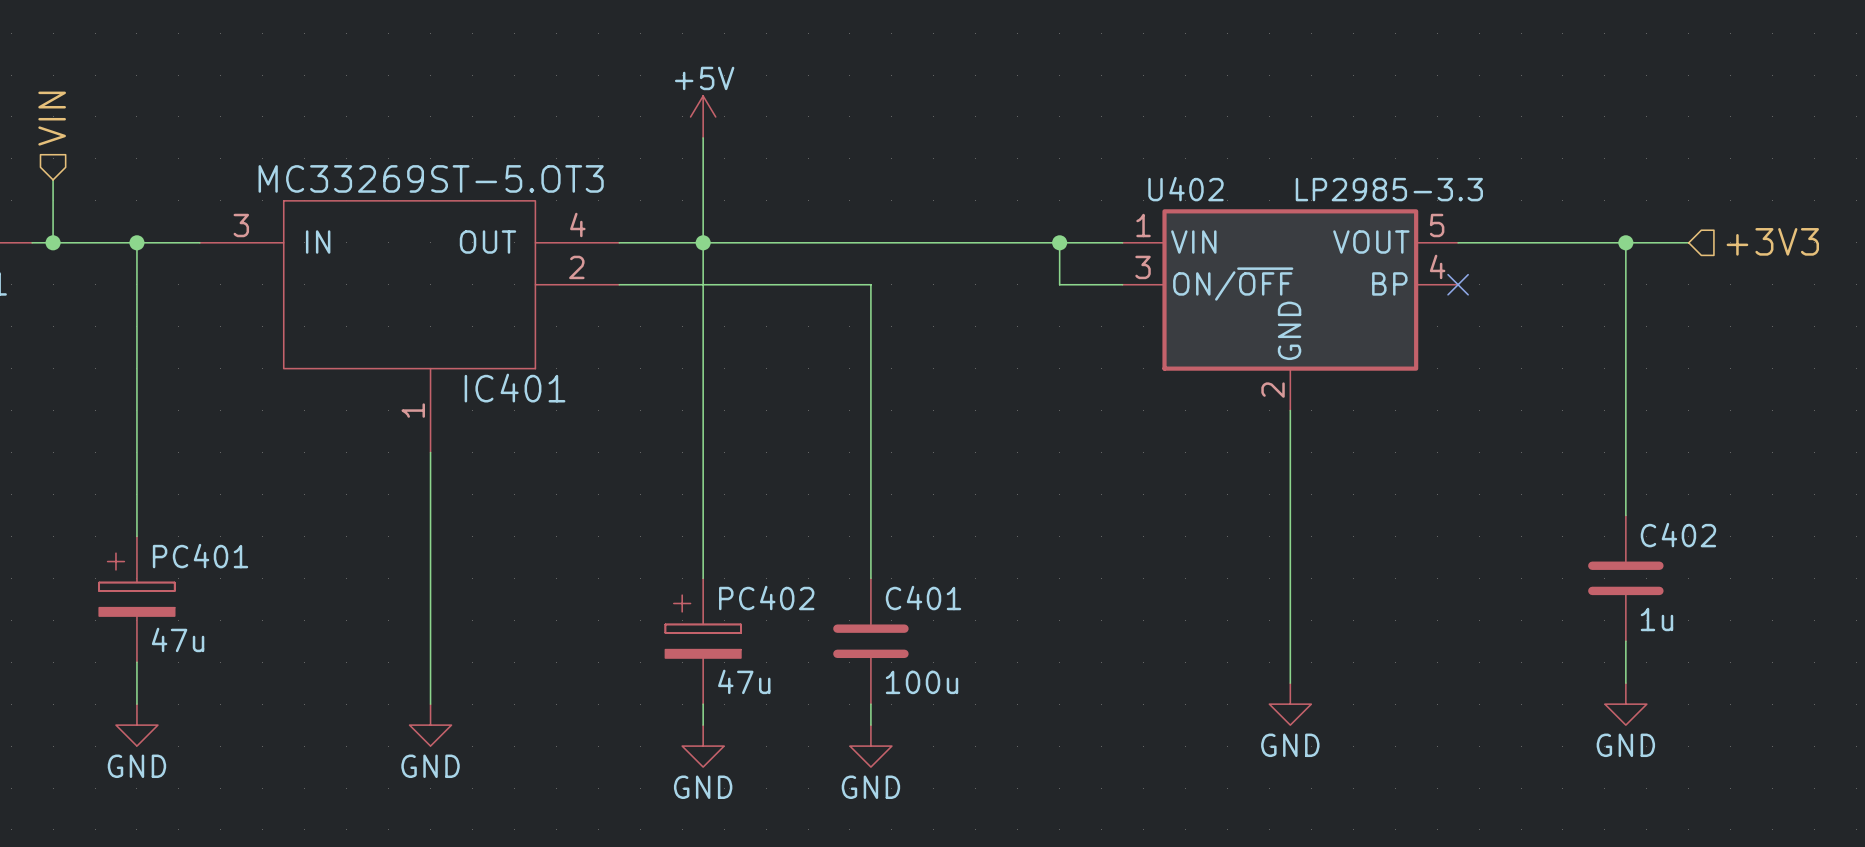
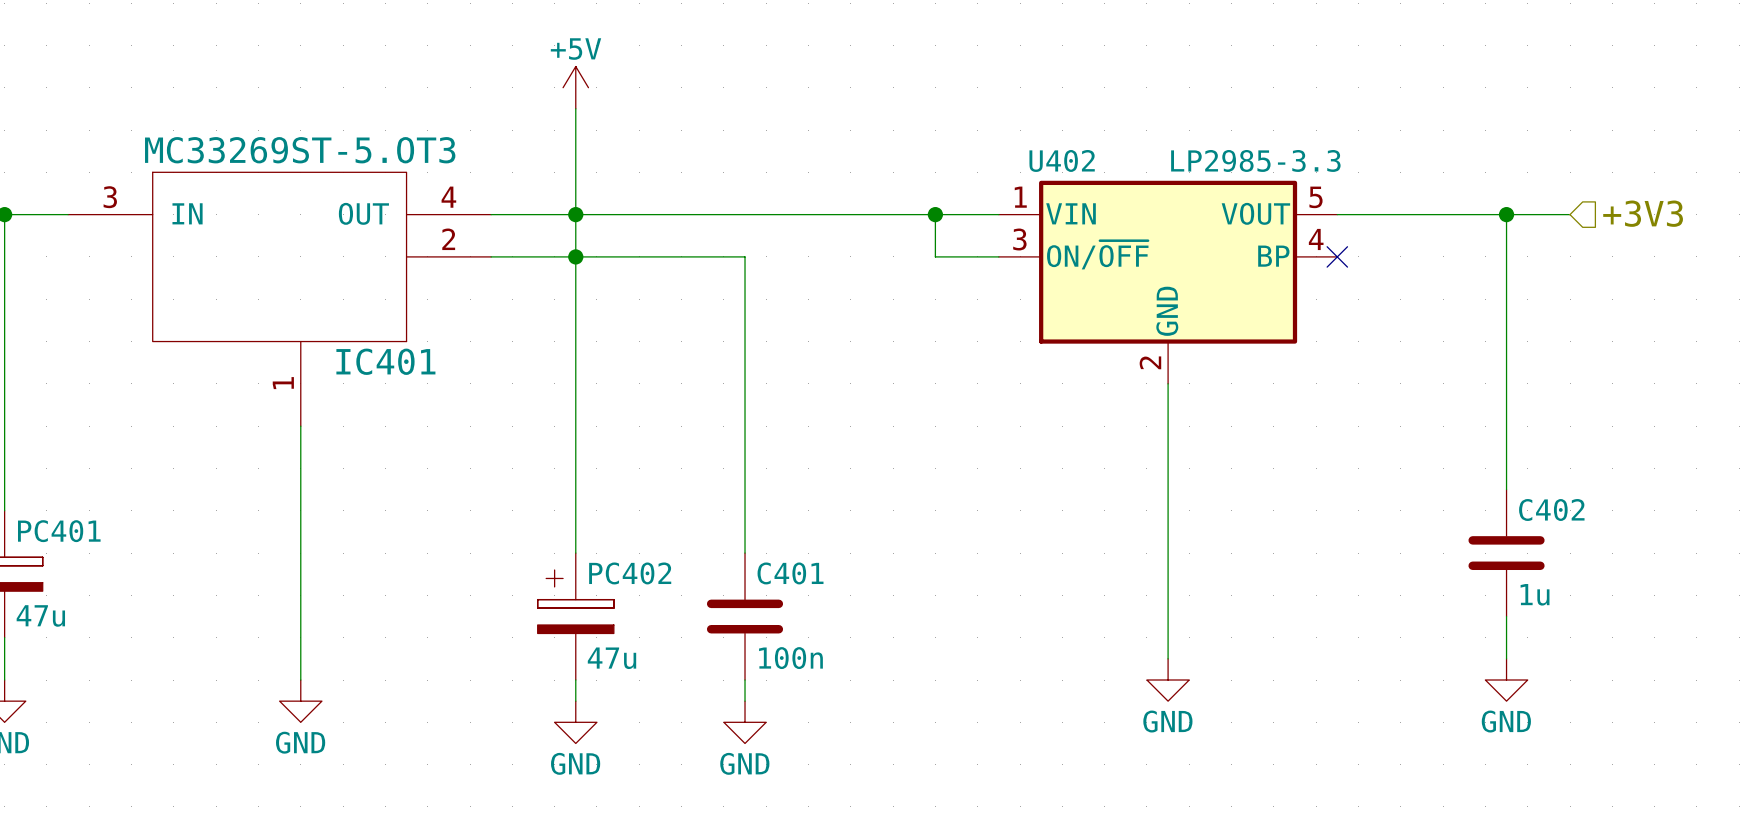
junction: none -> (575, 256)
C401 value: 100u (922, 682) -> 100n (790, 658)

